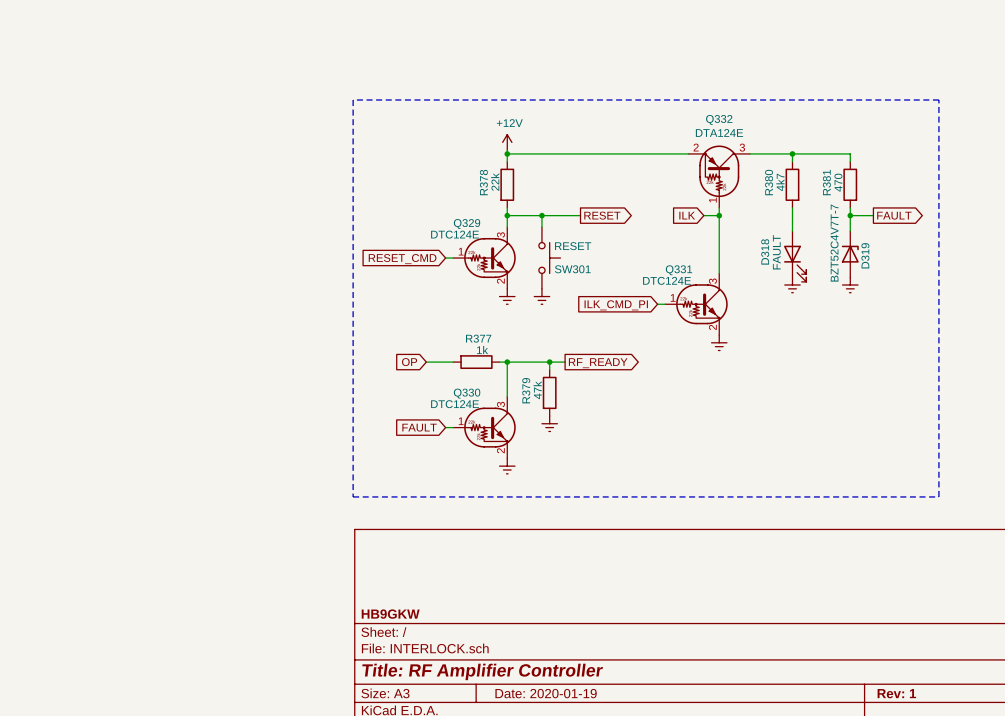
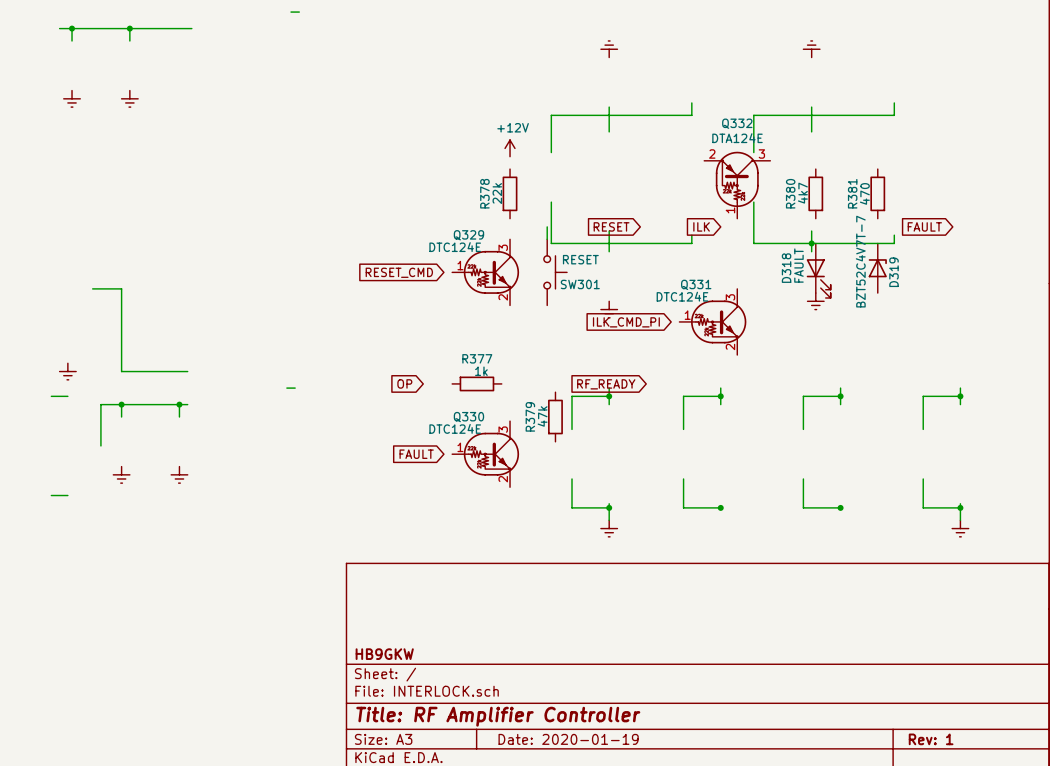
wire: none -> (291, 12) (299, 12)
wire: none -> (59, 28) (191, 28)
wire: none -> (72, 28) (72, 40)
junction: none -> (72, 28)
wire: none -> (129, 28) (129, 40)
junction: none -> (129, 28)
power symbol: none -> (609, 49)
power symbol: none -> (811, 49)
power symbol: none -> (72, 98)
power symbol: none -> (129, 98)
line: (353, 100) (353, 496) (938, 496) (938, 100) (353, 100) -> none
wire: none -> (691, 102) (691, 115) (551, 115) (551, 152)
wire: none -> (894, 102) (894, 115) (753, 115) (753, 152)
wire: none -> (609, 107) (609, 131)
wire: (507, 150) (507, 161) -> none
wire: (507, 153) (688, 153) -> none
junction: (507, 153) -> none
wire: (750, 153) (850, 153) (850, 161) -> none
wire: (792, 153) (792, 161) -> none
junction: (792, 153) -> none
wire: none -> (551, 202) (551, 243) (691, 243) (691, 235)
wire: none -> (753, 202) (753, 243) (894, 243) (894, 235)
wire: (507, 207) (507, 227) -> (609, 231) (609, 251)
wire: (719, 207) (719, 273) -> none
wire: (792, 207) (792, 231) -> (811, 107) (811, 131)
wire: (850, 207) (850, 231) -> none
wire: (507, 215) (580, 215) -> none
junction: (507, 215) -> none
junction: (541, 215) -> none
wire: (703, 215) (719, 215) -> none
junction: (719, 215) -> none
wire: (850, 215) (873, 215) -> none
junction: (850, 215) -> none
wire: none -> (811, 231) (811, 251)
junction: none -> (811, 243)
wire: (445, 258) (453, 258) -> none
wire: none -> (92, 288) (121, 288) (121, 371) (187, 371)
power symbol: (850, 284) -> none
power symbol: none -> (609, 309)
power symbol: (507, 296) -> none
power symbol: (541, 296) -> none
wire: (657, 304) (665, 304) -> none
power symbol: (719, 342) -> none
power symbol: none -> (67, 371)
wire: (426, 362) (453, 362) -> none
wire: (499, 362) (565, 362) -> none
wire: (507, 362) (507, 396) -> none
junction: (507, 362) -> none
wire: (549, 362) (549, 369) -> none
junction: (549, 362) -> none
wire: none -> (286, 388) (295, 388)
wire: none -> (609, 388) (609, 404)
wire: none -> (720, 388) (720, 404)
wire: none -> (840, 388) (840, 404)
wire: none -> (960, 388) (960, 404)
wire: none -> (51, 396) (67, 396)
wire: none -> (609, 396) (572, 396) (572, 429)
junction: none -> (609, 396)
wire: none -> (720, 396) (683, 396) (683, 429)
junction: none -> (720, 396)
wire: none -> (840, 396) (803, 396) (803, 429)
junction: none -> (840, 396)
wire: none -> (960, 396) (923, 396) (923, 429)
junction: none -> (960, 396)
wire: none -> (121, 404) (121, 417)
junction: none -> (121, 404)
wire: none -> (179, 404) (179, 417)
junction: none -> (179, 404)
wire: none -> (187, 404) (100, 404) (100, 445)
power symbol: (549, 423) -> none
wire: (445, 427) (453, 427) -> none
power symbol: none -> (121, 474)
power symbol: none -> (179, 474)
wire: none -> (572, 478) (572, 507) (609, 507)
wire: none -> (683, 478) (683, 507) (720, 507)
wire: none -> (803, 478) (803, 507) (840, 507)
wire: none -> (923, 478) (923, 507) (960, 507)
wire: none -> (51, 495) (67, 495)
power symbol: (507, 466) -> none
wire: none -> (609, 503) (609, 520)
wire: none -> (960, 503) (960, 520)
junction: none -> (609, 507)
junction: none -> (720, 507)
junction: none -> (840, 507)
junction: none -> (960, 507)
power symbol: none -> (609, 528)
power symbol: none -> (960, 528)

